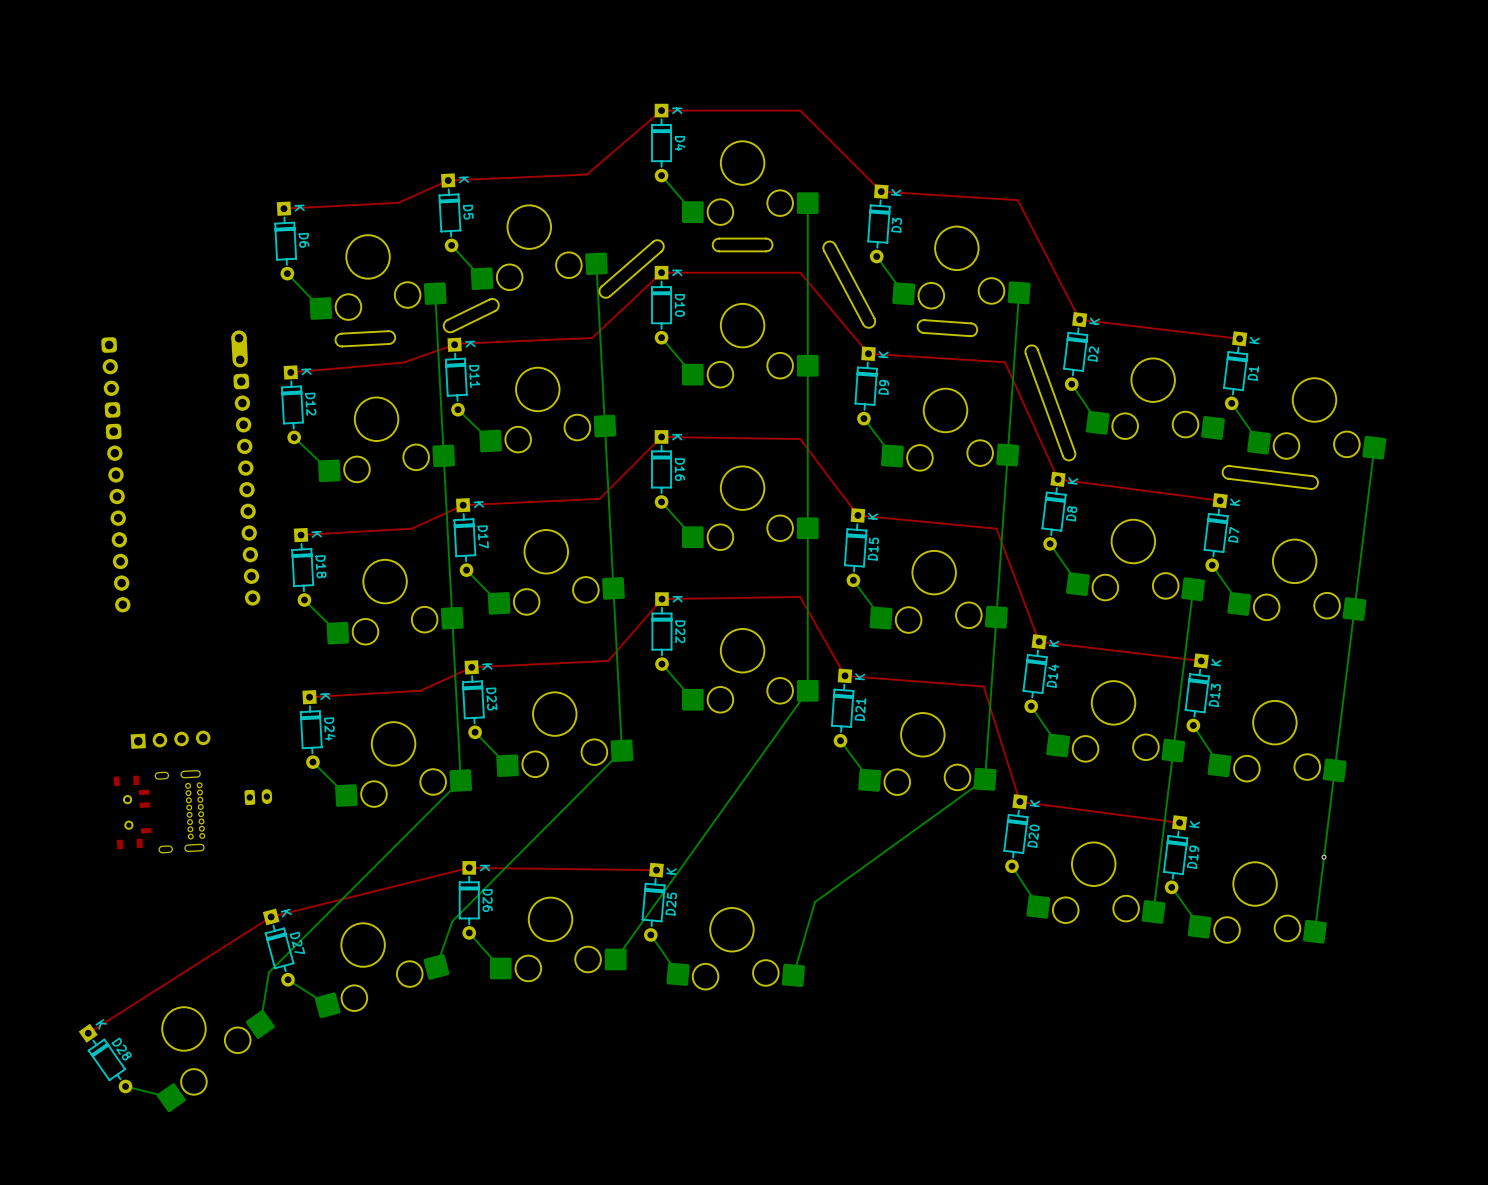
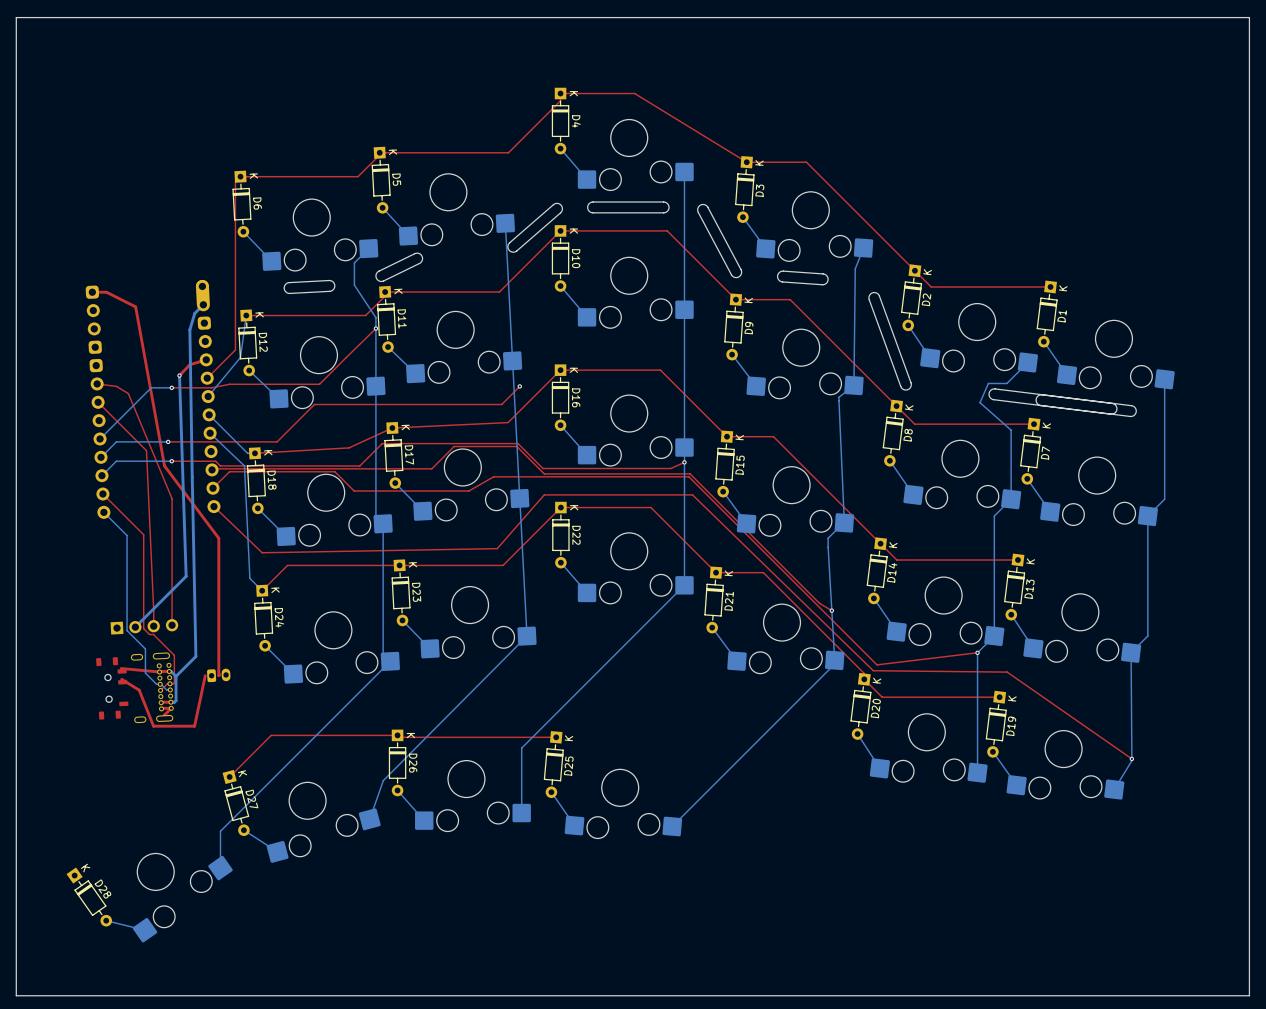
board edge: none -> (1249, 17) (16, 17) (16, 995) (1249, 995) (1249, 17)
top track: (661, 110) (586, 174) (448, 180) (398, 202) (283, 208) -> (560, 93) (560, 100) (508, 152) (379, 152) (358, 176) (240, 176) (235, 181) (235, 349) (207, 378)
top track: (749, 110) (800, 110) (881, 191) (1017, 200) (1079, 319) (1239, 338) -> (634, 93) (746, 162) (806, 162) (931, 286) (1050, 286)
board edge: (719, 238) (714, 240) (712, 244) (714, 249) (719, 251) -> (609, 202) (591, 202) (587, 207) (591, 212) (609, 212)
board edge: (766, 238) (770, 240) (772, 244) (770, 249) (766, 251) -> (649, 202) (665, 202) (669, 207) (665, 212) (649, 212)
top track: (661, 272) (592, 337) (453, 343) -> (560, 230) (499, 292) (385, 292) (385, 296) (365, 315) (246, 315)
top track: (787, 272) (800, 272) (868, 353) (1004, 362) (1058, 479) (1220, 500) -> (667, 230) (735, 299) (790, 299) (914, 424) (1034, 424)
bottom track: (1019, 292) (985, 779) (815, 902) (793, 975) -> (863, 248) (855, 268) (853, 385) (838, 397) (844, 522) (828, 538) (834, 664) (672, 826)
bottom track: (435, 293) (460, 780) (269, 972) (260, 1024) -> (368, 248) (354, 262) (354, 285) (375, 317) (375, 516) (383, 523) (383, 654) (390, 661) (220, 831) (220, 868)
top track: (454, 344) (403, 362) (290, 372) -> none
top track: none -> (92, 292) (106, 292) (135, 306) (164, 465) (218, 538) (219, 674)
bottom track: none -> (203, 304) (194, 313) (189, 329) (195, 656) (176, 676)
bottom track: none -> (246, 315) (240, 357) (208, 396)
top track: none -> (375, 328) (319, 384) (229, 384) (211, 387) (171, 387)
via: none -> (375, 328)
top track: none -> (206, 359) (189, 364) (179, 375)
top track: (661, 436) (800, 439) (857, 515) (996, 528) (1039, 641) (1201, 660) -> (560, 370) (660, 370) (727, 436) (773, 436) (896, 560) (1017, 560)
bottom track: none -> (179, 375) (186, 576) (135, 627)
via: none -> (179, 375)
bottom track: (1374, 447) (1314, 931) -> (1164, 379) (1164, 499) (1147, 516) (1147, 636) (1131, 652) (1131, 760) (1114, 789)
top track: none -> (97, 383) (116, 386) (128, 393) (172, 498) (172, 625)
top track: none -> (519, 386) (501, 404) (314, 404) (277, 441) (168, 441)
via: none -> (519, 386)
bottom track: none -> (171, 387) (151, 387) (100, 438)
via: none -> (171, 387)
board edge: none -> (995, 388) (1131, 405) (1135, 407) (1136, 411) (1134, 415) (1130, 416) (993, 399) (990, 397) (989, 393) (991, 390) (995, 388)
top track: none -> (98, 402) (146, 450) (153, 626)
bottom track: none -> (209, 414) (247, 453) (254, 453)
bottom track: none -> (210, 433) (244, 465) (249, 578) (262, 590)
bottom track: none -> (168, 441) (116, 441) (101, 457)
via: none -> (168, 441)
top track: none -> (171, 461) (215, 461) (220, 465) (359, 465) (382, 443) (518, 443) (542, 468) (670, 468) (684, 462)
bottom track: none -> (171, 461) (116, 461) (101, 475)
via: none -> (171, 461)
via: none -> (684, 462)
top track: none -> (212, 469) (431, 468) (454, 446) (516, 446) (544, 473) (690, 473) (819, 603) (831, 610)
top track: none -> (213, 488) (229, 471) (334, 471) (354, 491) (468, 491) (493, 476) (688, 476) (876, 664) (977, 652)
top track: none -> (102, 494) (143, 534) (143, 628) (149, 634) (153, 634) (174, 655) (174, 682) (167, 683) (160, 690)
bottom track: (1193, 589) (1153, 911) -> (1027, 362) (1006, 383) (988, 383) (980, 402) (1011, 430) (1011, 499) (994, 516) (994, 636) (977, 652) (977, 772)
top track: none -> (213, 506) (262, 552) (497, 548) (544, 494) (692, 494) (873, 670) (1007, 672) (1131, 758)
bottom track: none -> (103, 512) (127, 535) (127, 630) (145, 648) (145, 673) (156, 684) (161, 684) (166, 689) (170, 689)
bottom track: (807, 690) (615, 959) -> (684, 585) (521, 748) (521, 813)
top track: (309, 697) (420, 690) (471, 667) (608, 660) (661, 599) (800, 596) (845, 675) (983, 686) (1019, 801) (1179, 822) -> (262, 590) (287, 565) (503, 565) (560, 507) (650, 507) (716, 572) (763, 572) (864, 673) (864, 679) (882, 697) (999, 697)
via: none -> (831, 610)
via: none -> (977, 652)
top track: none -> (121, 668) (169, 671)
bottom track: none -> (169, 671) (176, 676)
top track: none -> (205, 675) (194, 726) (153, 726) (139, 690) (121, 679)
bottom track: none -> (176, 676) (176, 700) (170, 702)
top track: none -> (170, 702) (161, 702)
top track: none -> (161, 708) (171, 708) (164, 714) (164, 718)
via position: (1324, 857) -> (1131, 758)
top track: (656, 870) (469, 867) (271, 916) (88, 1033) -> (556, 737) (271, 735) (229, 776)

